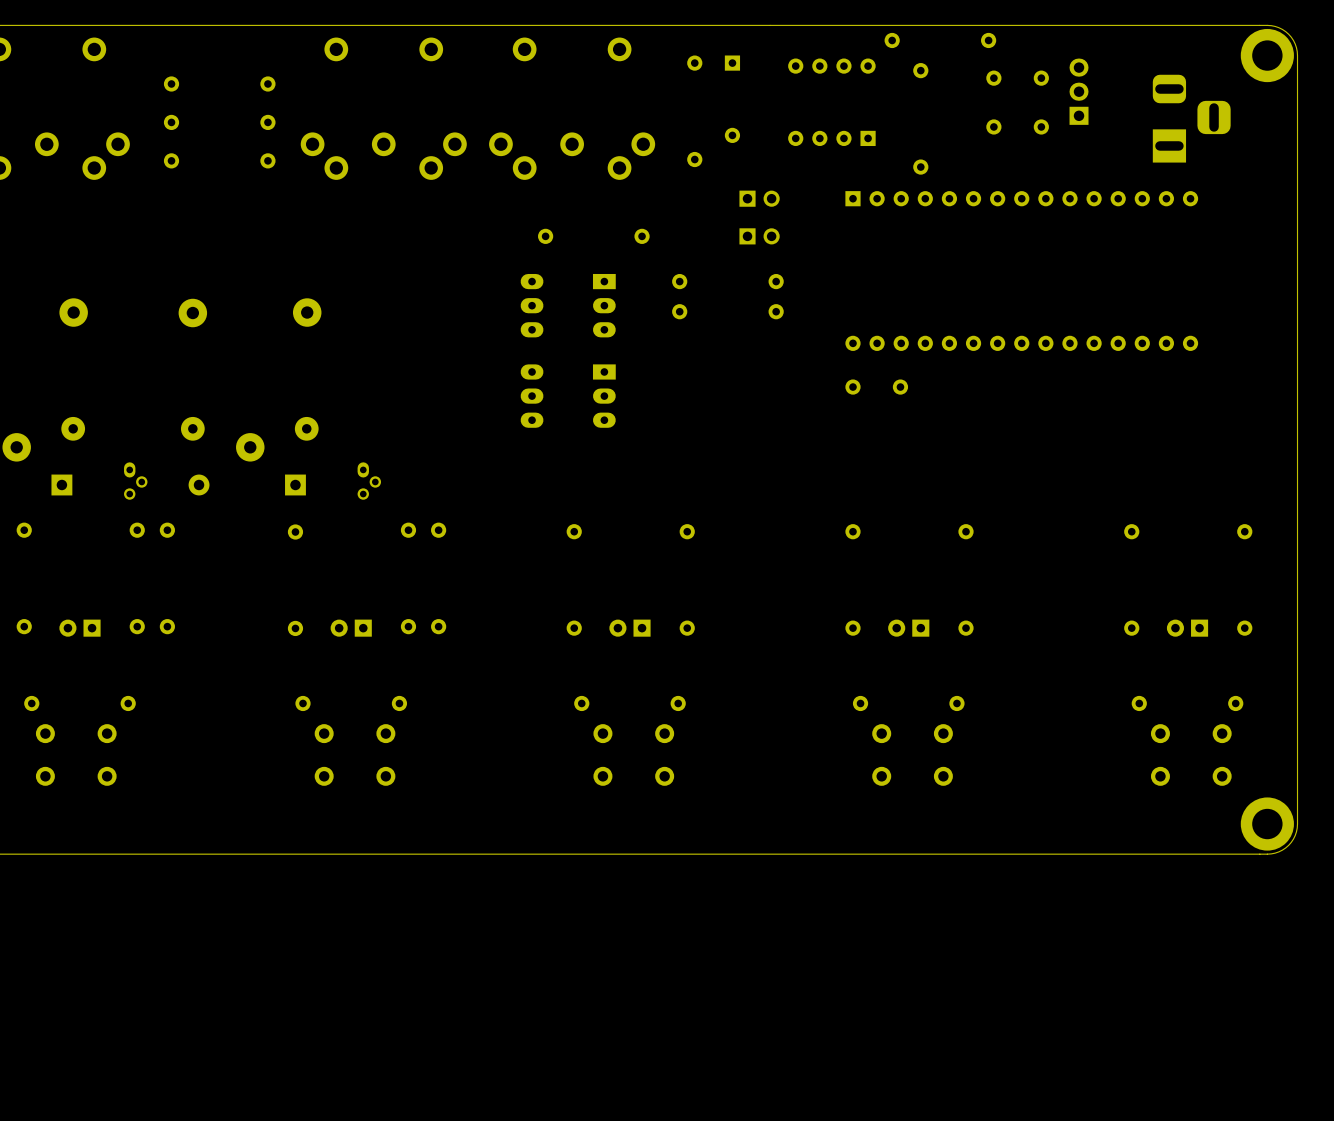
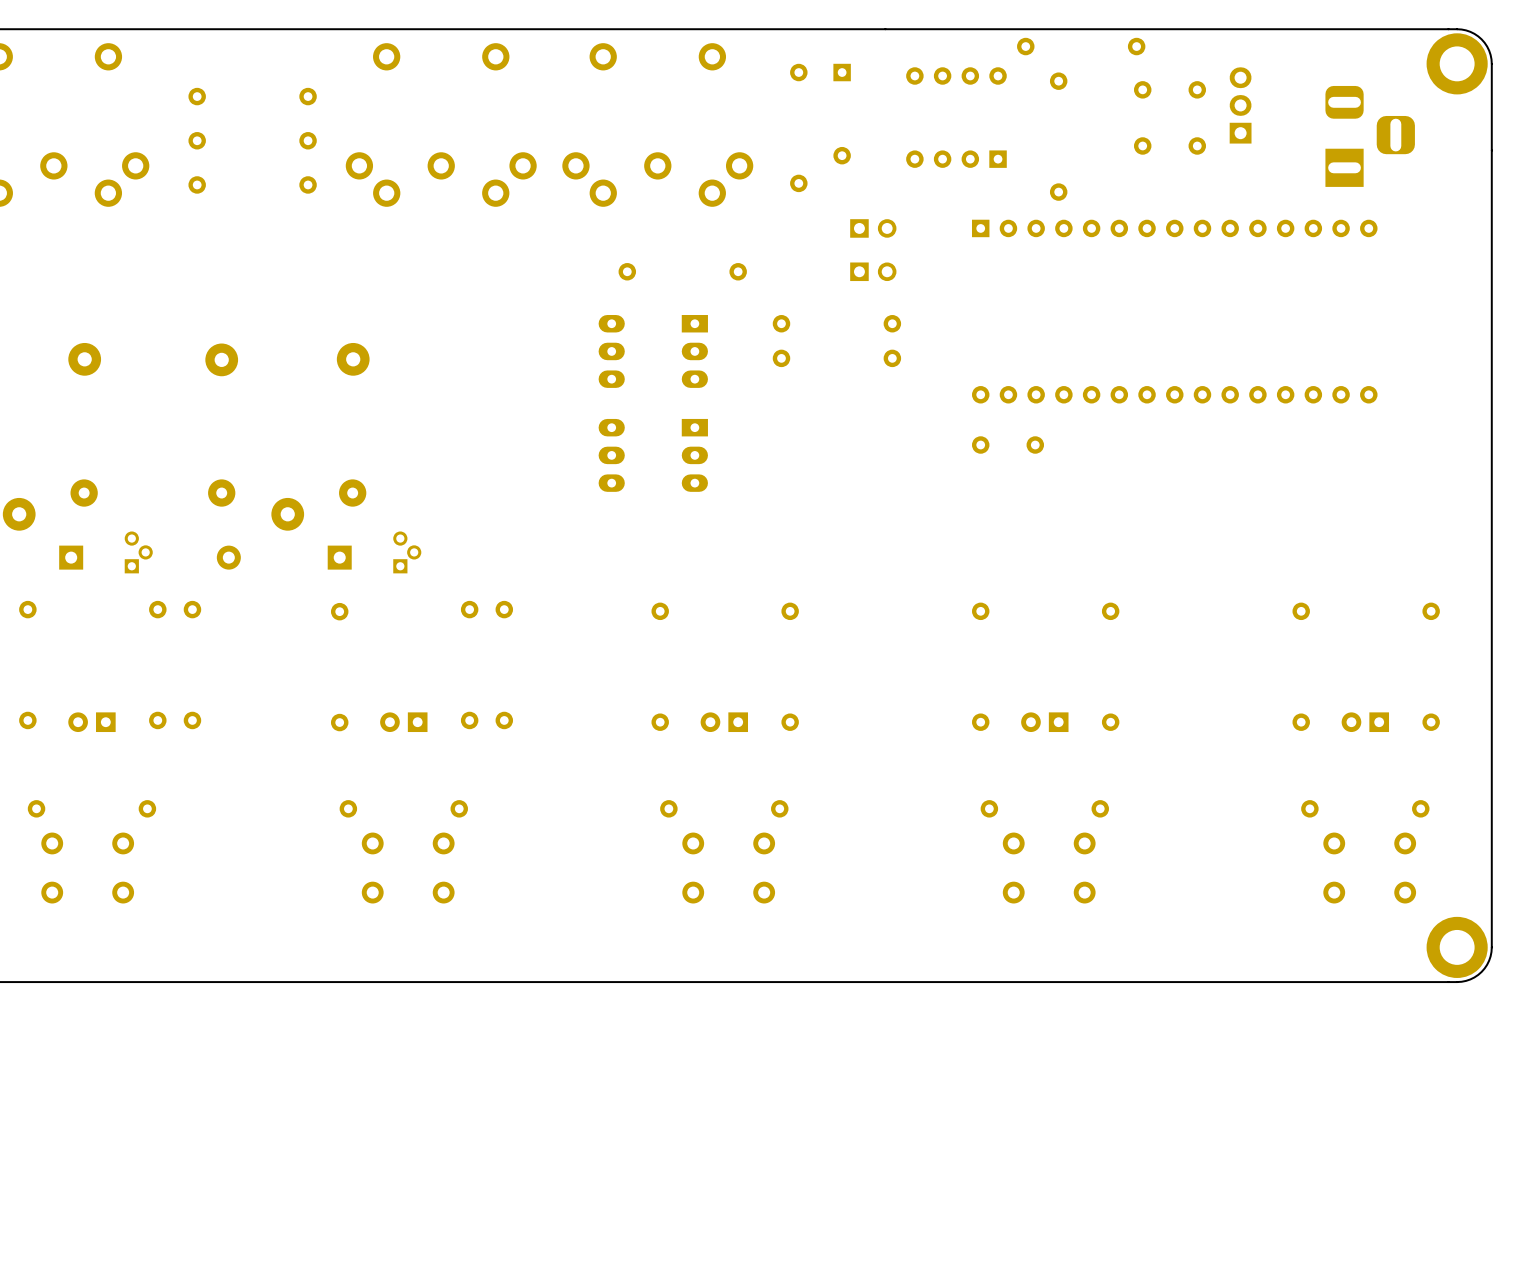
part: none -> (138, 552)
part: none -> (407, 552)
part: (135, 481) -> none
part: (369, 481) -> none

